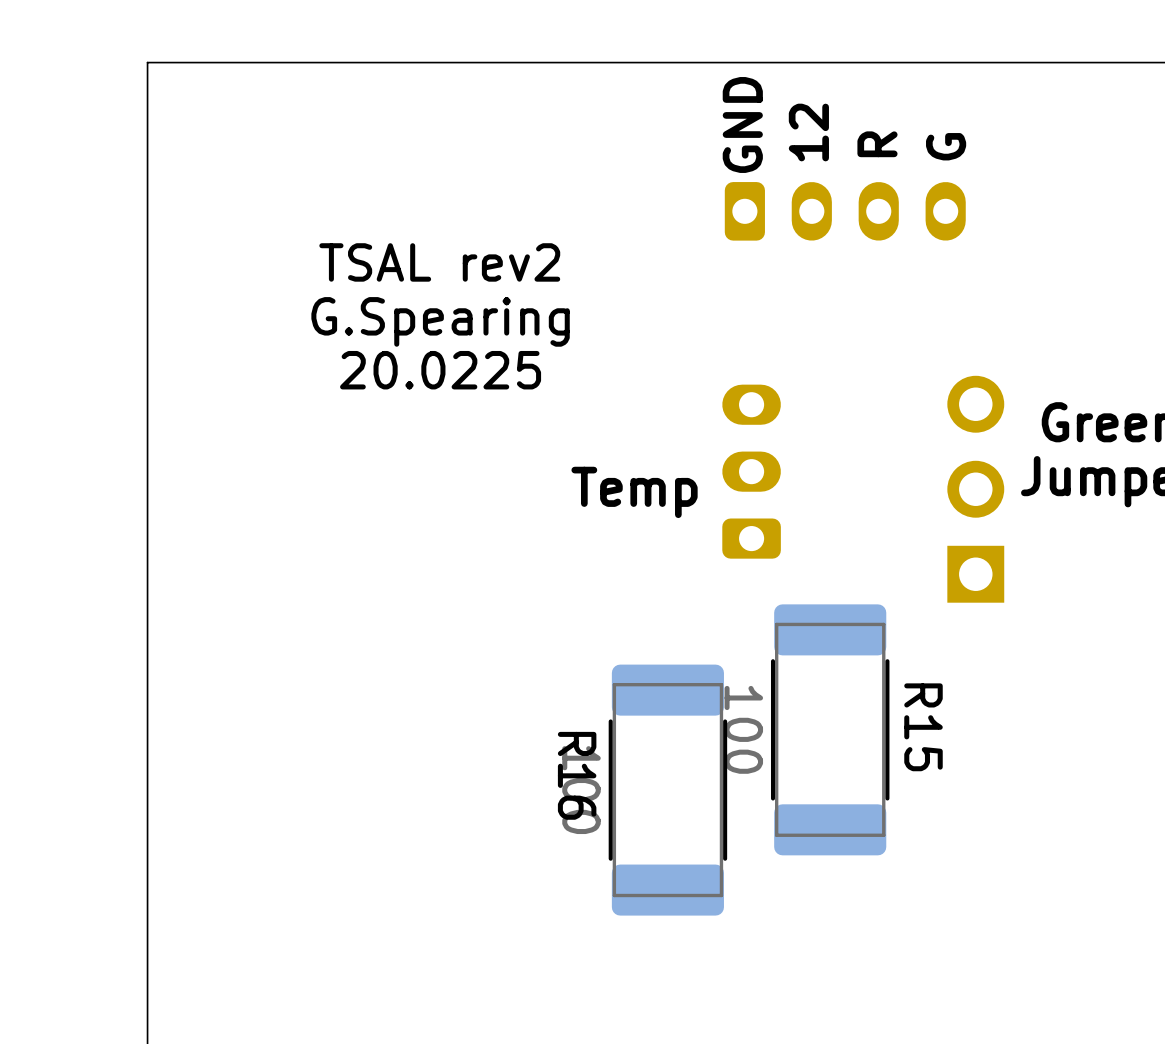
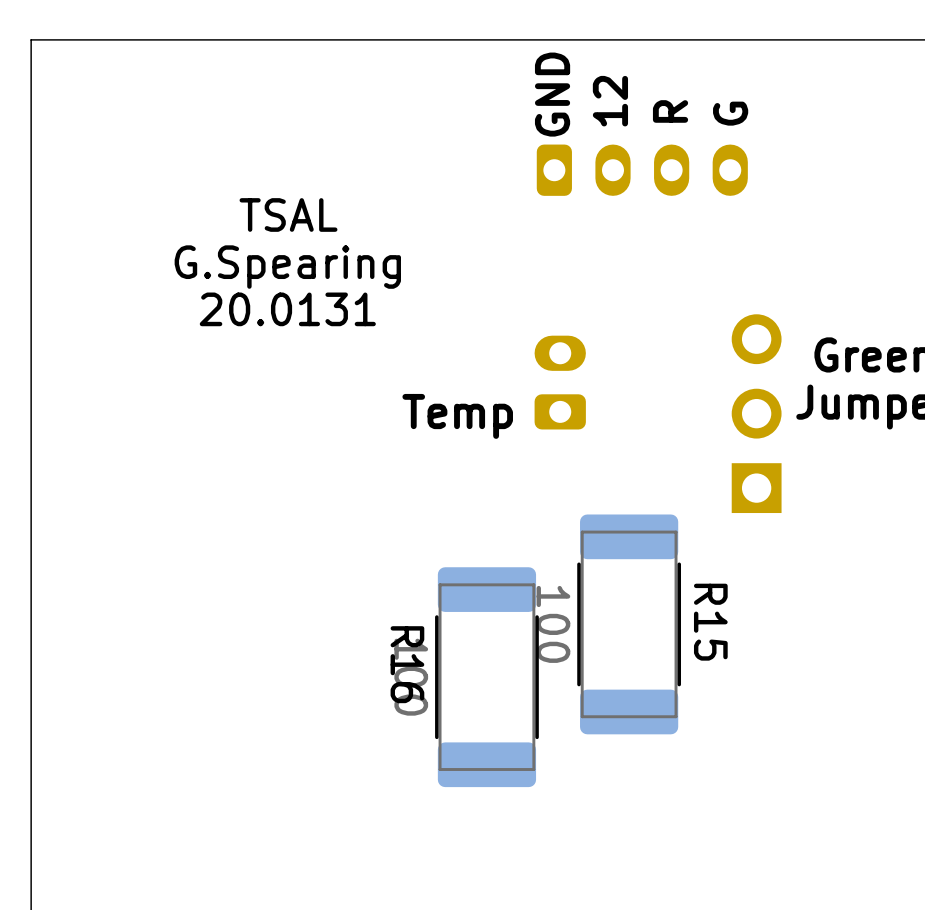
text: TSAL rev2 (439, 262) -> TSAL (288, 214)
text: 20.0225 (440, 370) -> 20.0131 (287, 309)
part footprint: [722, 384, 781, 559] -> [534, 335, 586, 430]

